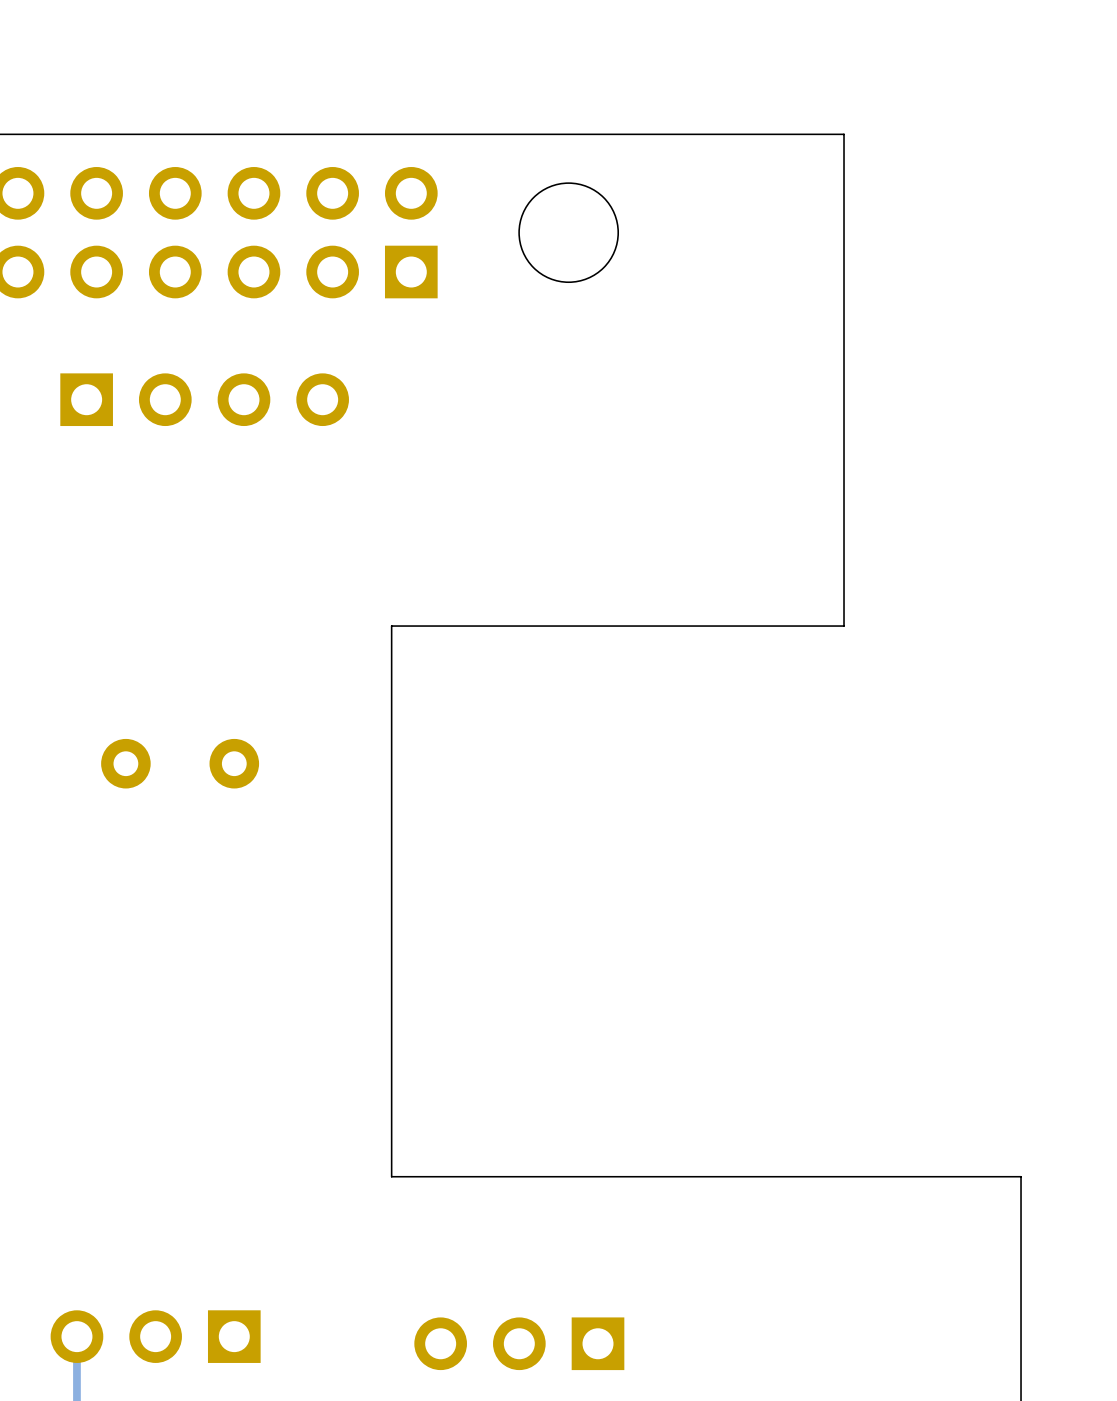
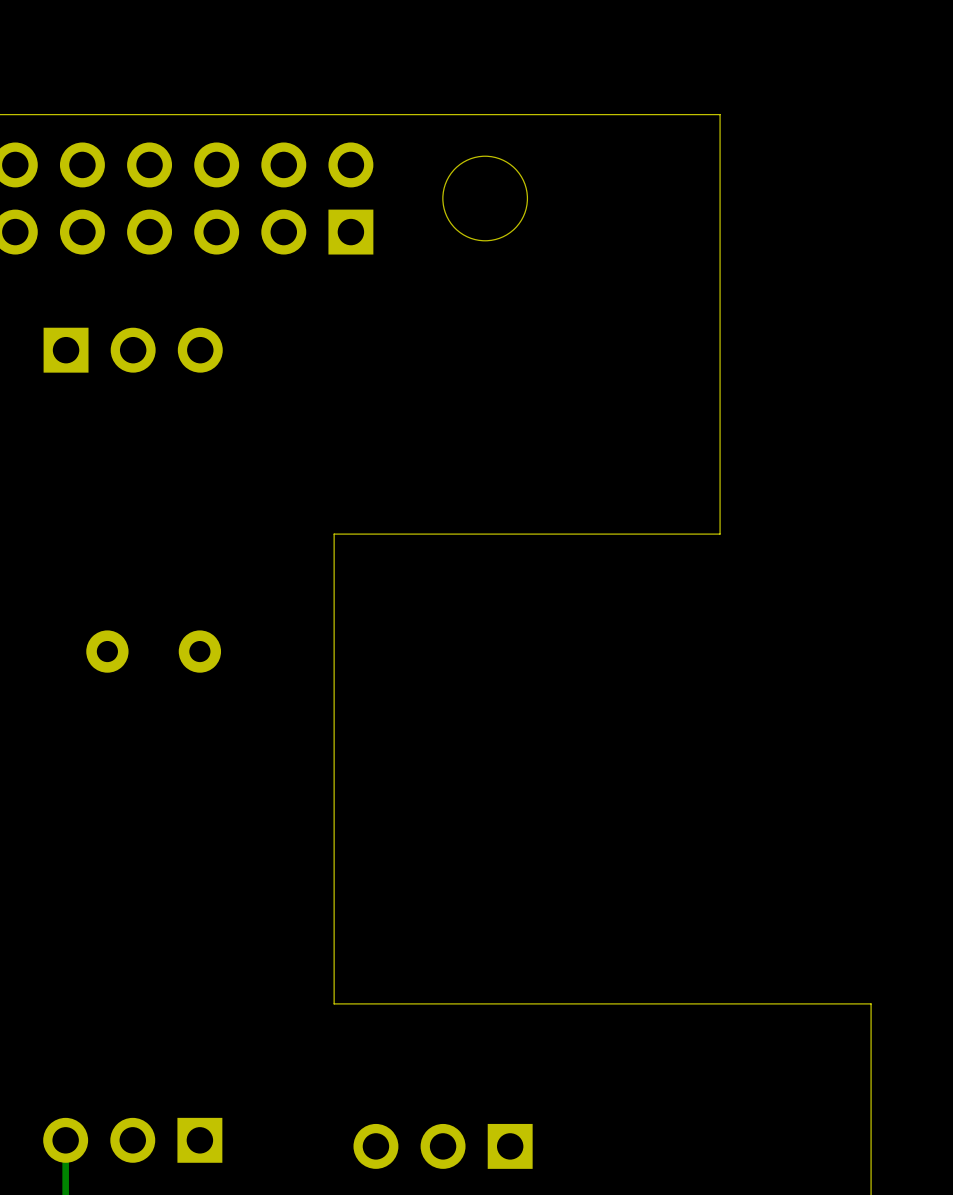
part: (204, 399) -> none
part: none -> (133, 350)

